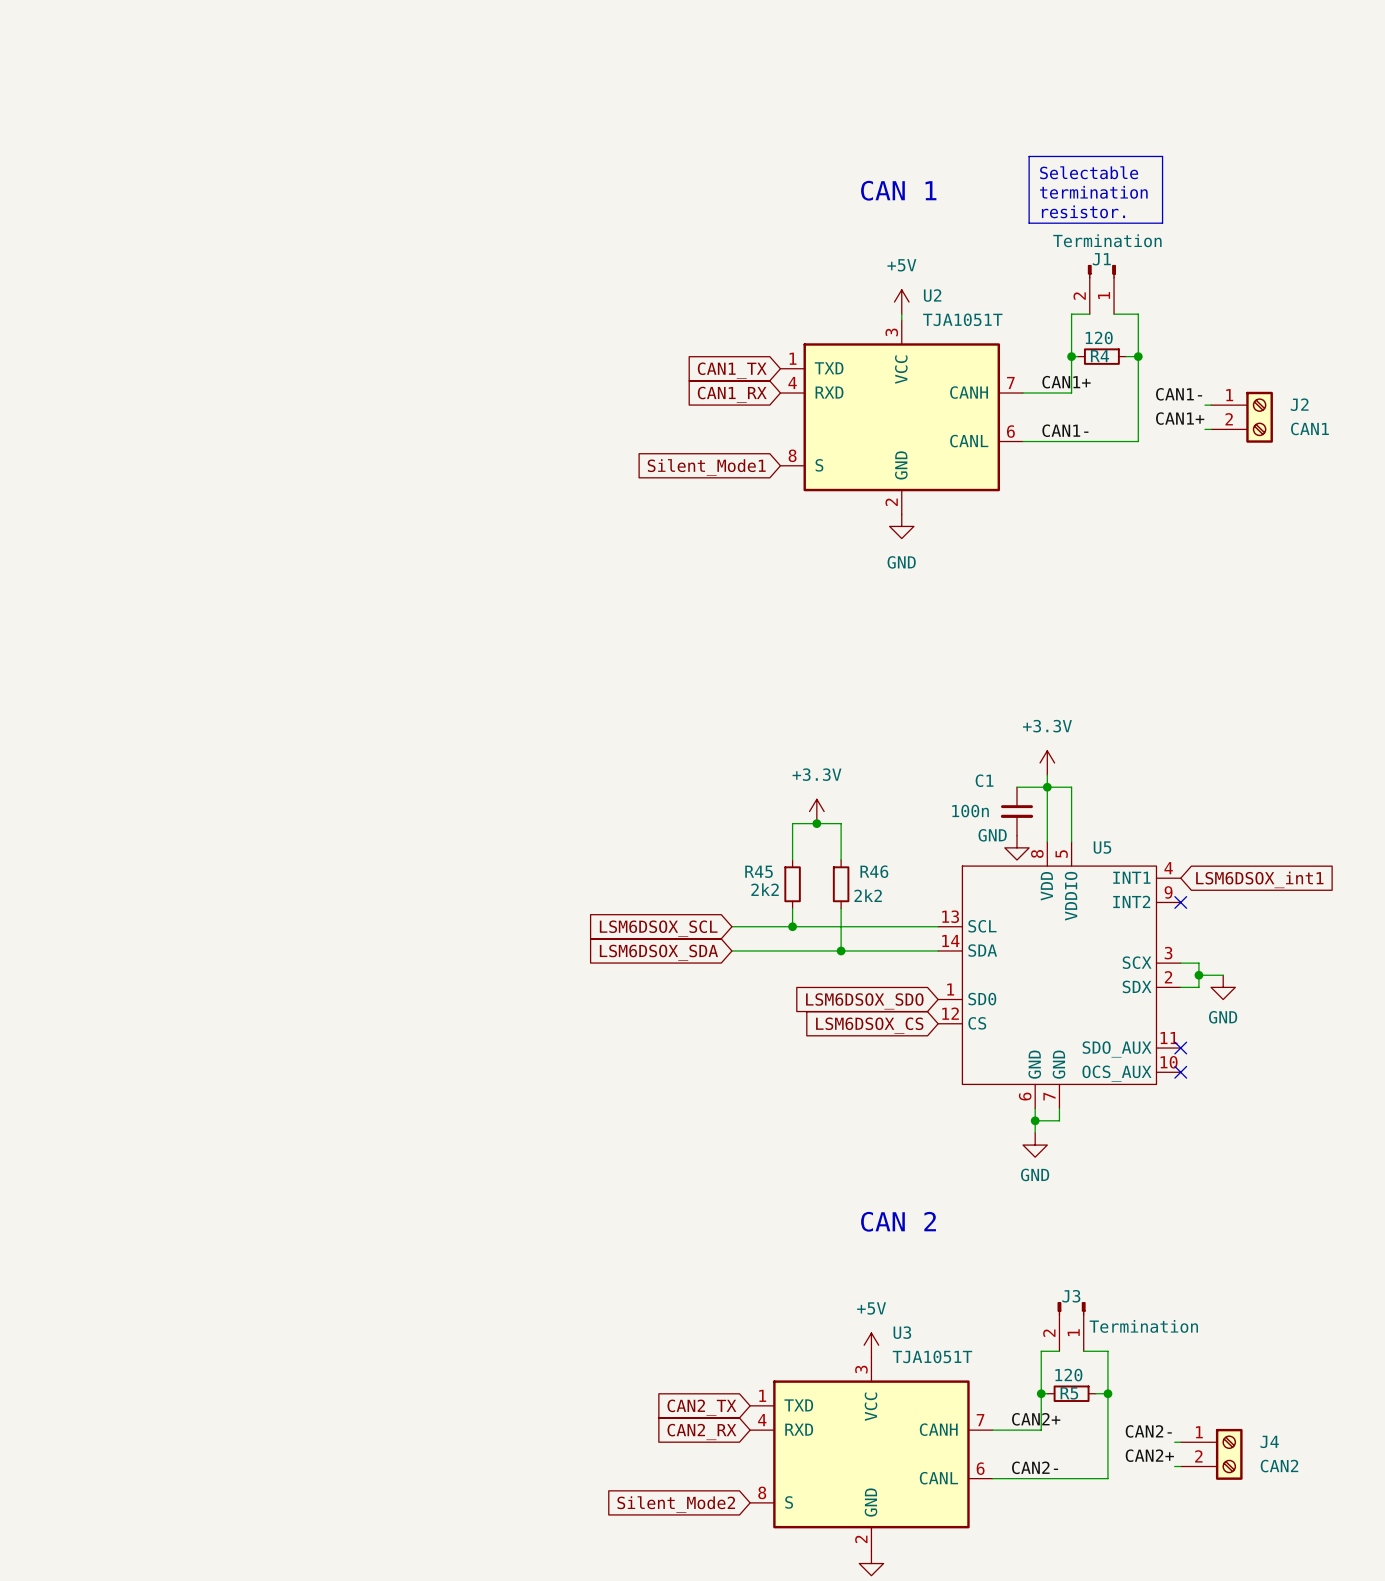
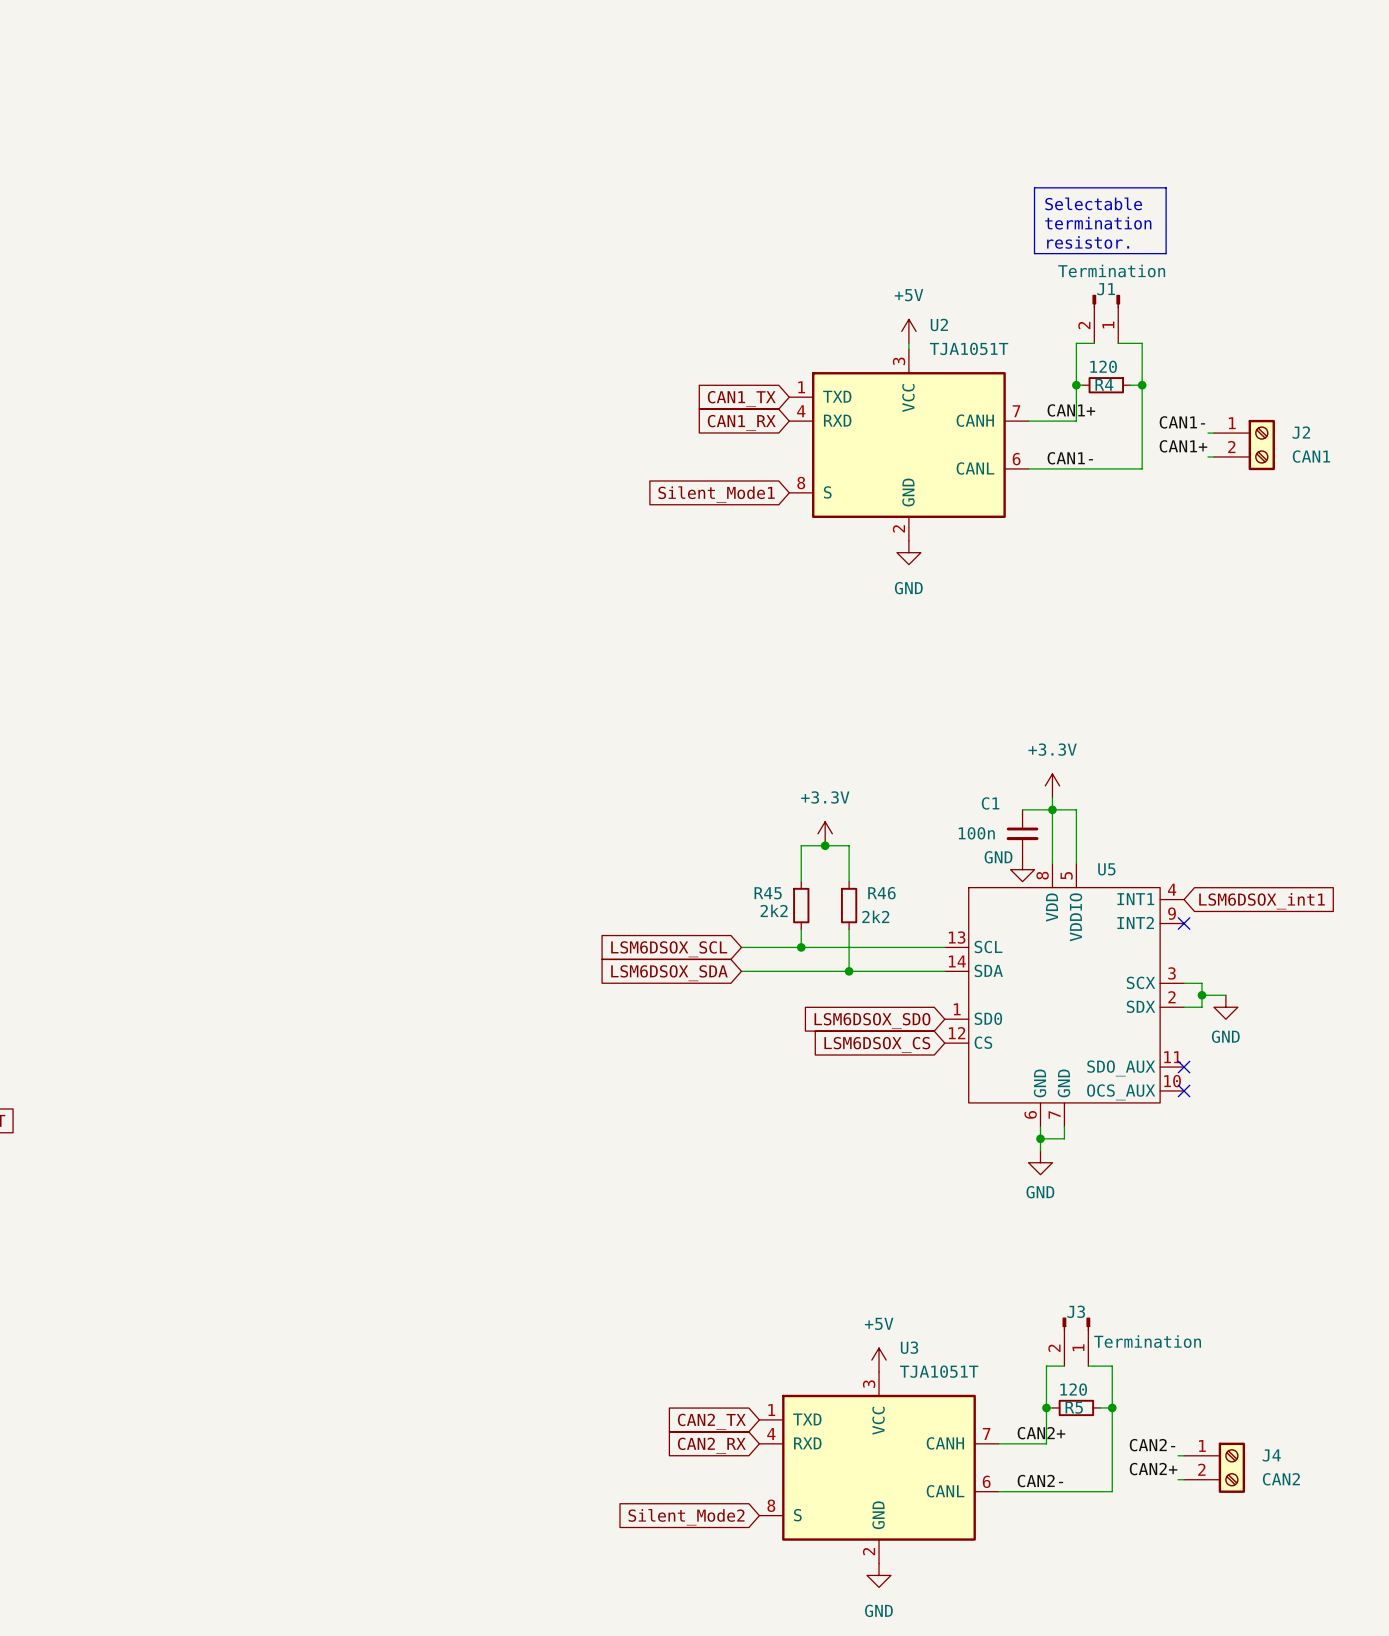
text: CAN 1 (898, 190) -> none
text: CAN 2 (898, 1221) -> none

